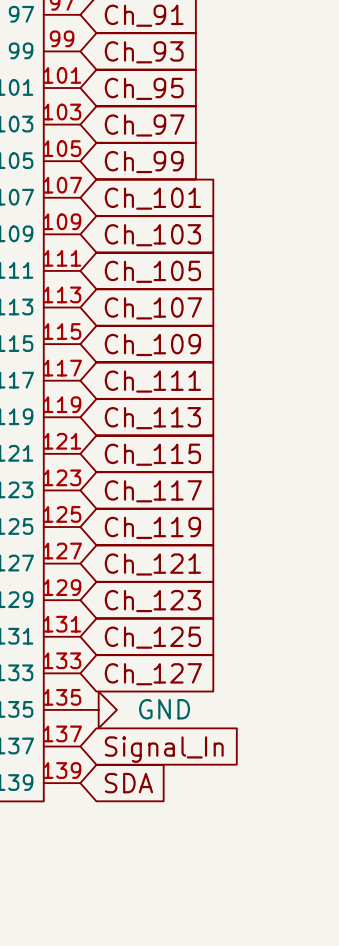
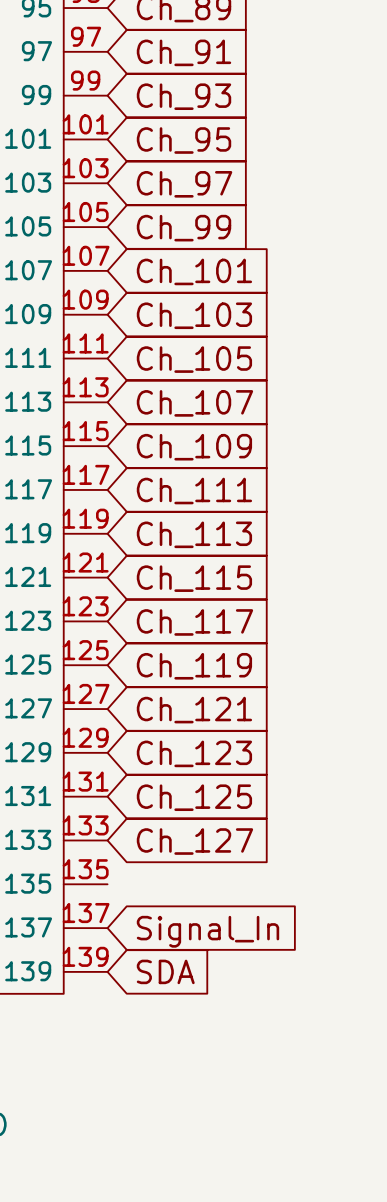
power symbol: GND (98, 709) -> none

